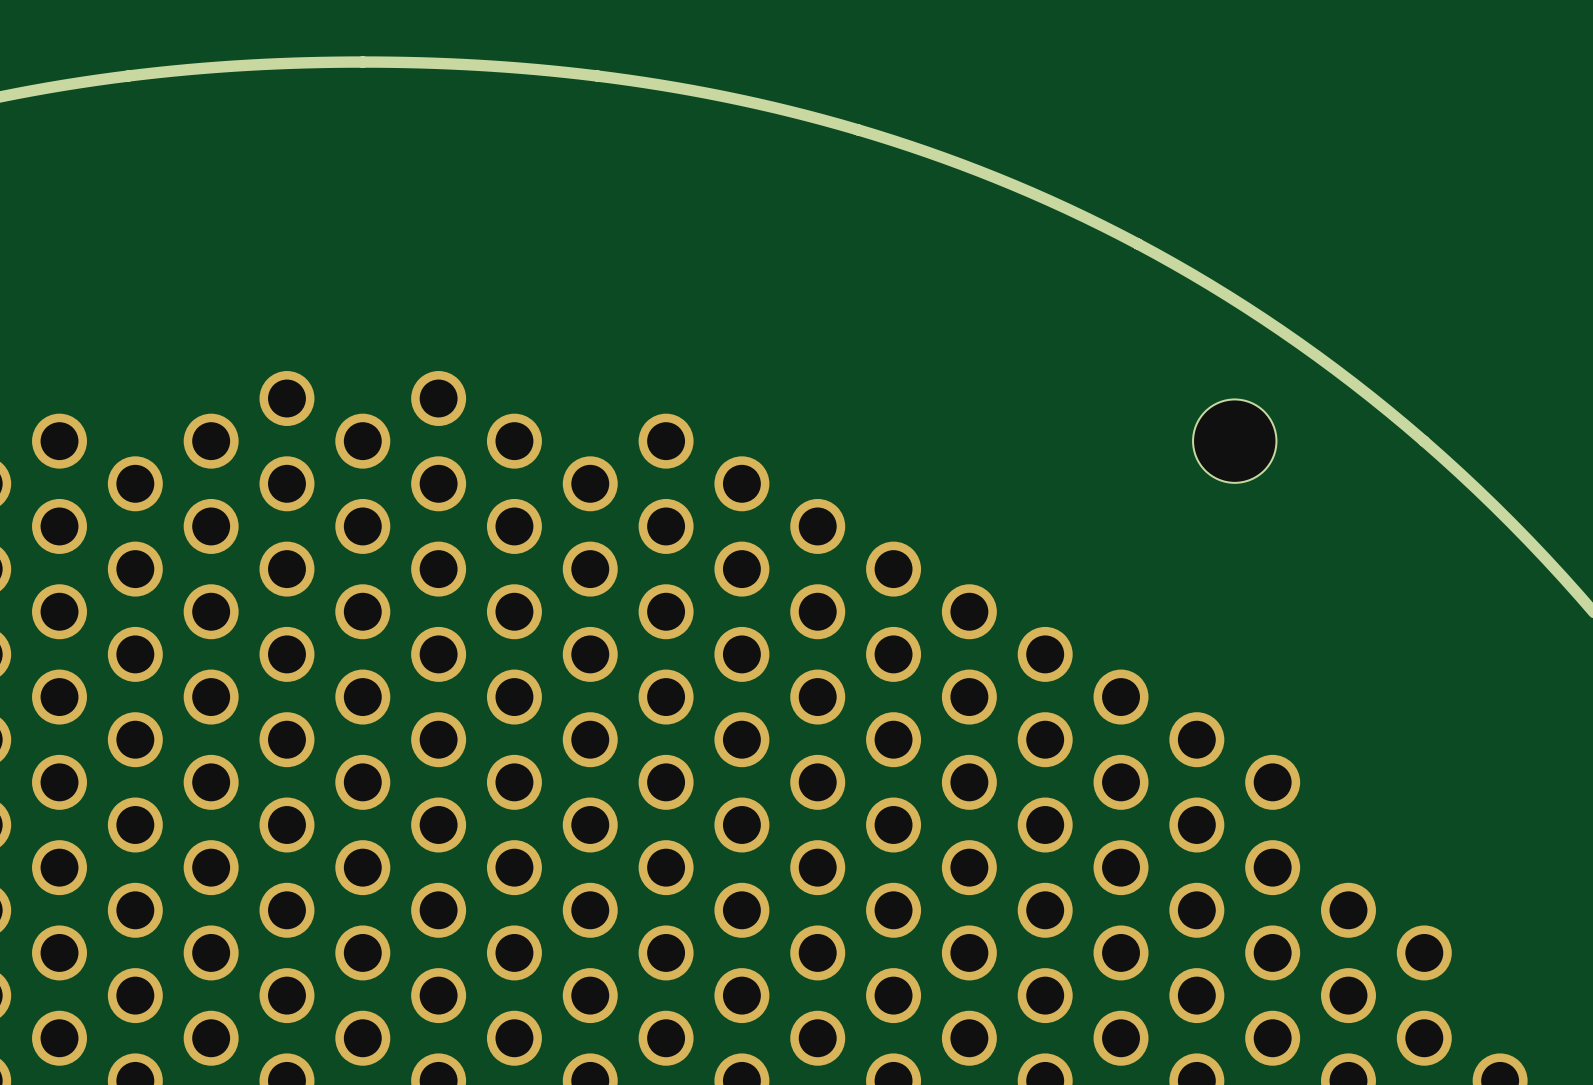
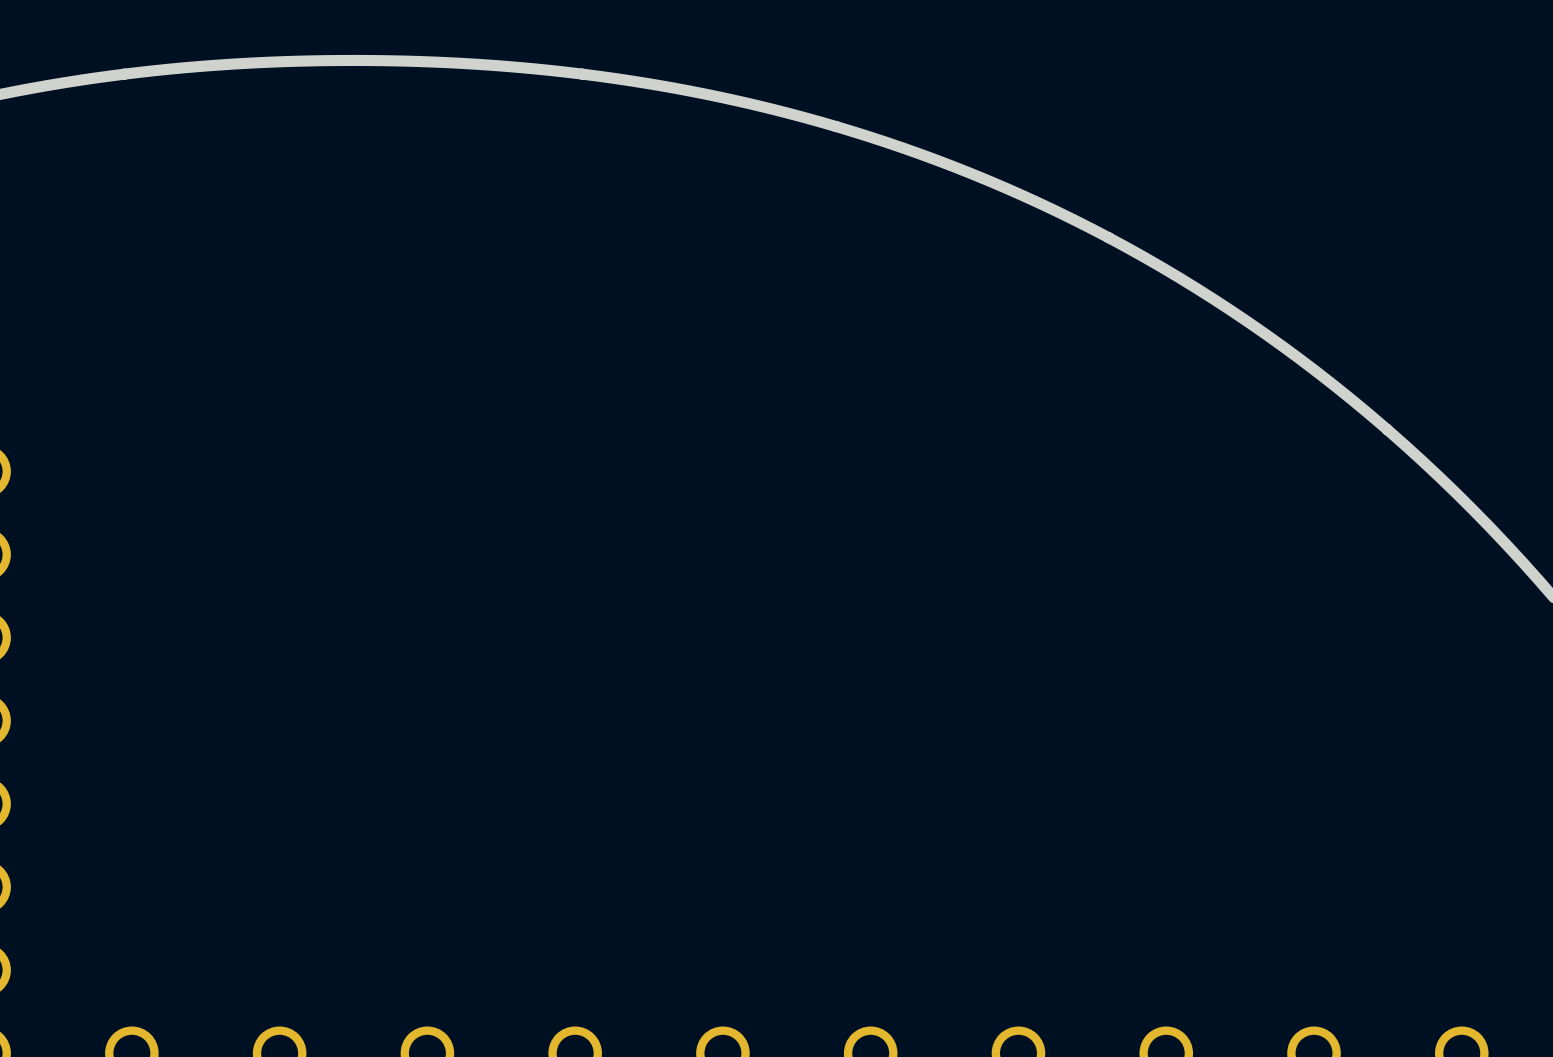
part: (286, 398) -> none
part: (438, 398) -> none
part: (59, 441) -> none
part: (211, 441) -> none
part: (362, 441) -> none
part: (514, 441) -> none
part: (666, 441) -> none
part: (1234, 441) -> none
part: (135, 483) -> none
part: (286, 483) -> none
part: (438, 483) -> none
part: (590, 483) -> none
part: (741, 483) -> none
part: (59, 526) -> none
part: (211, 526) -> none
part: (362, 526) -> none
part: (514, 526) -> none
part: (666, 526) -> none
part: (817, 526) -> none
part: (135, 569) -> none
part: (286, 569) -> none
part: (438, 569) -> none
part: (590, 569) -> none
part: (741, 569) -> none
part: (893, 569) -> none
part: (59, 611) -> none
part: (211, 611) -> none
part: (362, 611) -> none
part: (514, 611) -> none
part: (666, 611) -> none
part: (817, 611) -> none
part: (969, 611) -> none
part: (135, 654) -> none
part: (286, 654) -> none
part: (438, 654) -> none
part: (590, 654) -> none
part: (741, 654) -> none
part: (893, 654) -> none
part: (1045, 654) -> none
part: (59, 697) -> none
part: (211, 697) -> none
part: (362, 697) -> none
part: (514, 697) -> none
part: (666, 697) -> none
part: (817, 697) -> none
part: (969, 697) -> none
part: (1121, 697) -> none
part: (135, 739) -> none
part: (286, 739) -> none
part: (438, 739) -> none
part: (590, 739) -> none
part: (741, 739) -> none
part: (893, 739) -> none
part: (1045, 739) -> none
part: (1196, 739) -> none
part: (59, 782) -> none
part: (211, 782) -> none
part: (362, 782) -> none
part: (514, 782) -> none
part: (666, 782) -> none
part: (817, 782) -> none
part: (969, 782) -> none
part: (1121, 782) -> none
part: (1272, 782) -> none
part: (135, 825) -> none
part: (286, 825) -> none
part: (438, 825) -> none
part: (590, 825) -> none
part: (741, 825) -> none
part: (893, 825) -> none
part: (1045, 825) -> none
part: (1196, 825) -> none
part: (59, 867) -> none
part: (211, 867) -> none
part: (362, 867) -> none
part: (514, 867) -> none
part: (666, 867) -> none
part: (817, 867) -> none
part: (969, 867) -> none
part: (1121, 867) -> none
part: (1272, 867) -> none
part: (135, 910) -> none
part: (286, 910) -> none
part: (438, 910) -> none
part: (590, 910) -> none
part: (741, 910) -> none
part: (893, 910) -> none
part: (1045, 910) -> none
part: (1196, 910) -> none
part: (1348, 910) -> none
part: (59, 952) -> none
part: (211, 952) -> none
part: (362, 952) -> none
part: (514, 952) -> none
part: (666, 952) -> none
part: (817, 952) -> none
part: (969, 952) -> none
part: (1121, 952) -> none
part: (1272, 952) -> none
part: (1424, 952) -> none
part: (135, 995) -> none
part: (286, 995) -> none
part: (438, 995) -> none
part: (590, 995) -> none
part: (741, 995) -> none
part: (893, 995) -> none
part: (1045, 995) -> none
part: (1196, 995) -> none
part: (1348, 995) -> none
part: (59, 1038) -> none
part: (211, 1038) -> none
part: (362, 1038) -> none
part: (514, 1038) -> none
part: (666, 1038) -> none
part: (817, 1038) -> none
part: (969, 1038) -> none
part: (1121, 1038) -> none
part: (1272, 1038) -> none
part: (1424, 1038) -> none

